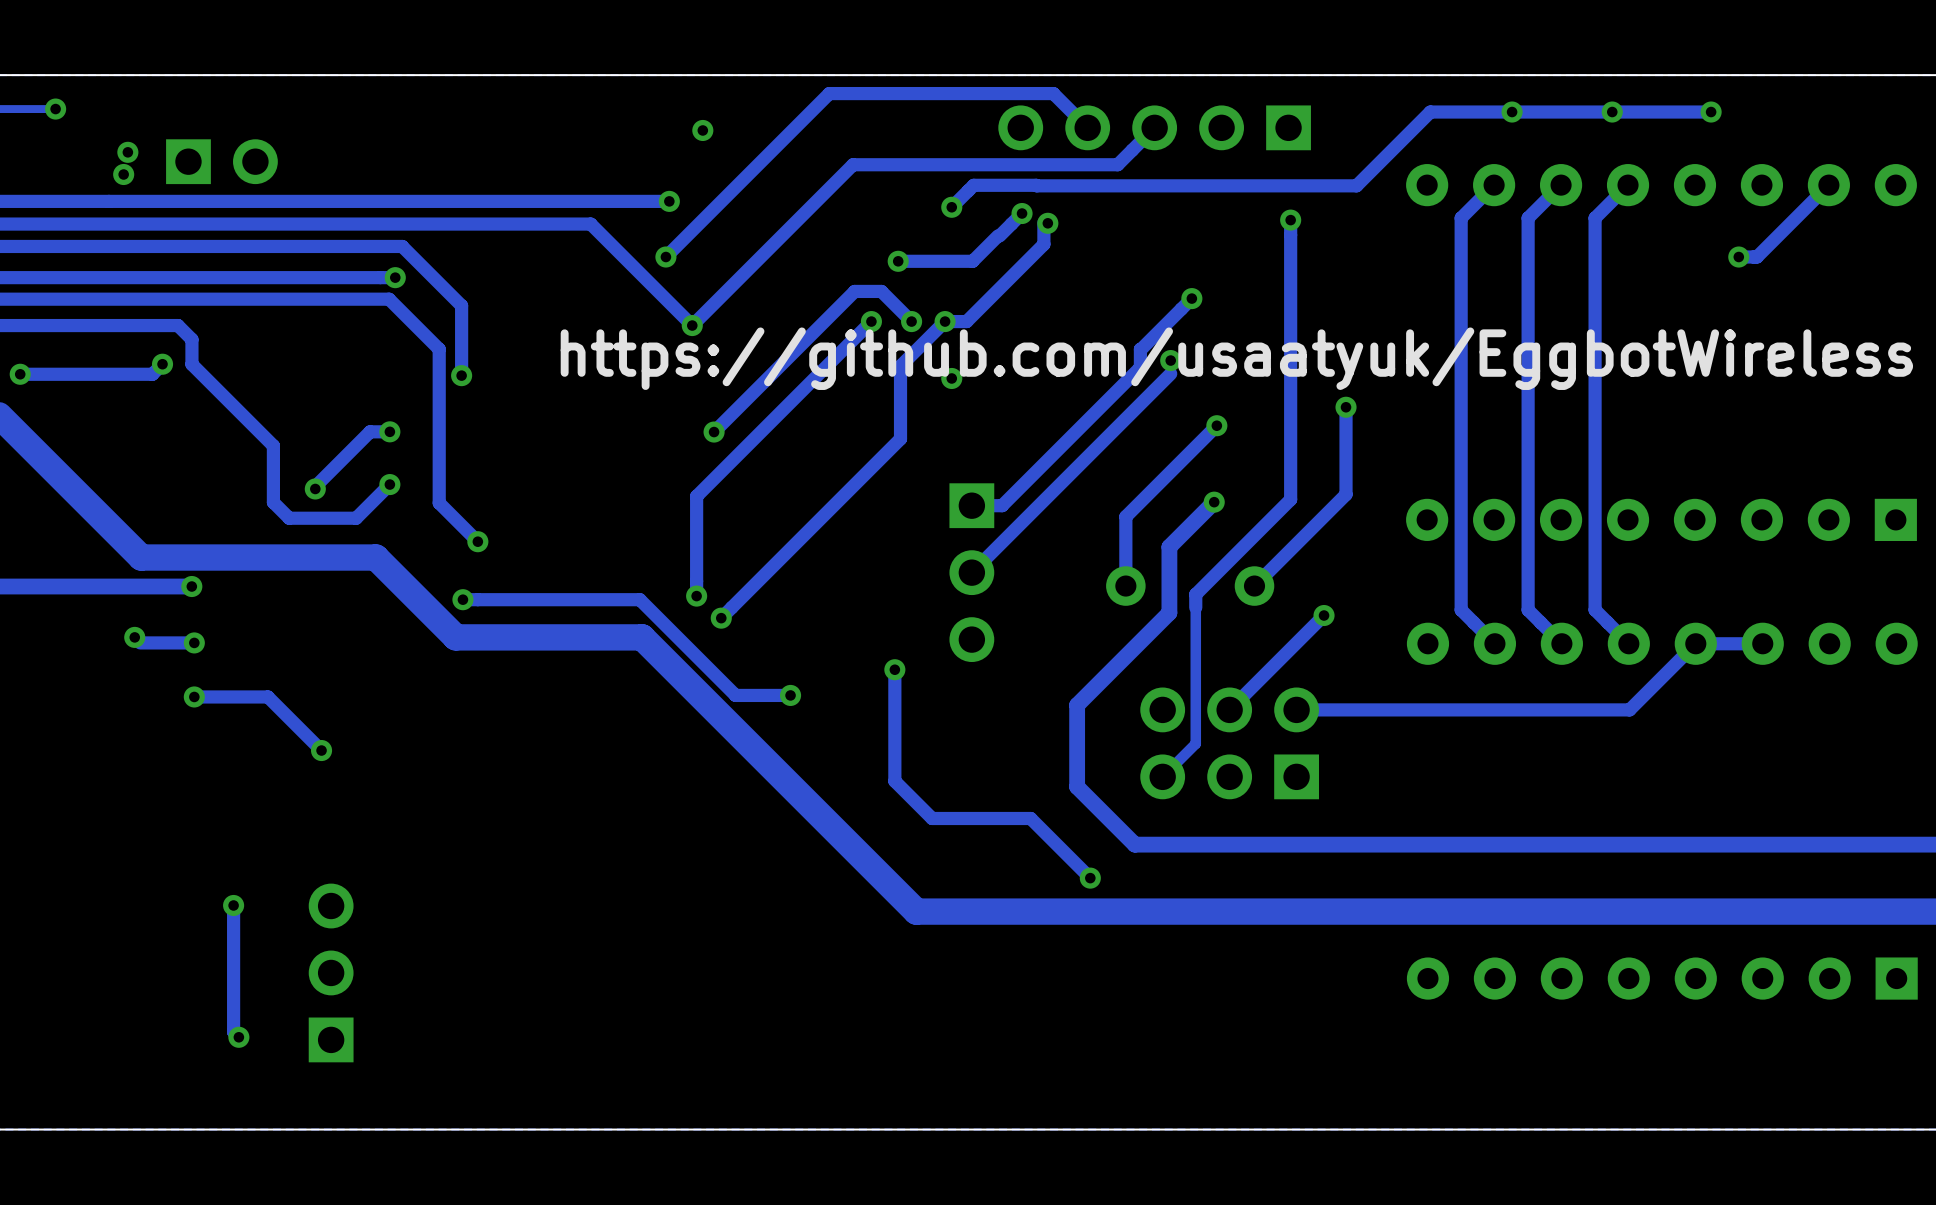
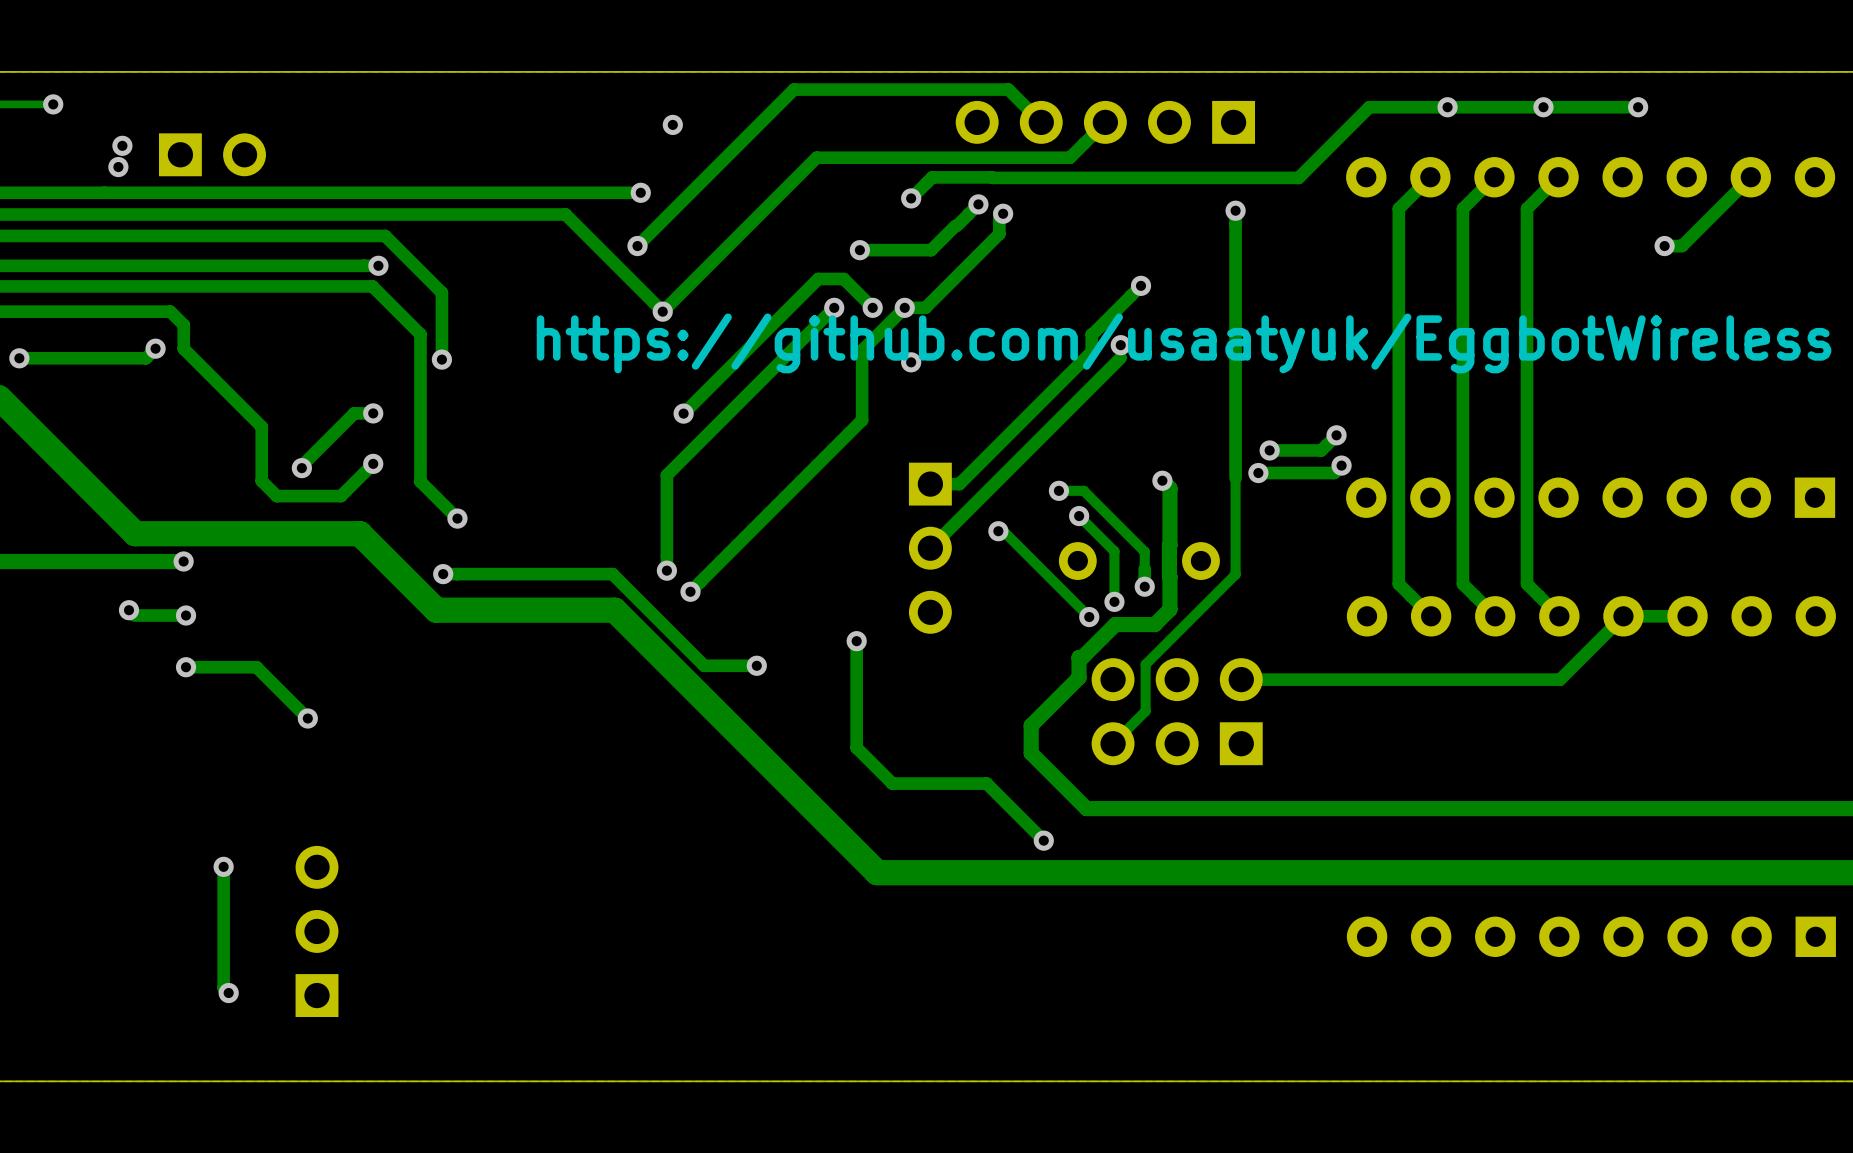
track: (1346, 407) (1346, 494) (1254, 586) -> none
via: (1346, 407) -> none
track: (1216, 425) (1125, 516) (1125, 586) -> none
via: (1216, 425) -> none
track: none -> (1336, 435) (1321, 450) (1269, 450)
via: none -> (1336, 435)
via: none -> (1269, 450)
track: none -> (1341, 465) (1334, 473) (1258, 473)
via: none -> (1341, 465)
via: none -> (1258, 473)
track: (1290, 499) (1195, 594) -> (1058, 490) (1083, 490) (1144, 551) (1144, 569)
track: (1214, 502) (1169, 546) (1169, 612) (1077, 705) (1077, 757) -> (1162, 480) (1169, 488) (1169, 609) (1154, 624) (1115, 624) (1082, 657) (1079, 657) (1079, 677) (1031, 725)
via: none -> (1058, 490)
track: none -> (1079, 516) (1114, 551) (1114, 601)
via: none -> (1079, 516)
track: none -> (998, 531) (1003, 531) (1089, 617)
via: none -> (998, 531)
track: (1195, 612) (1195, 743) -> (1235, 478) (1235, 574) (1145, 664) (1144, 712)
via: none -> (1144, 586)
track: (1324, 615) (1229, 709) -> none
via: (1324, 615) -> none
via: none -> (1114, 601)
via: none -> (1089, 617)

